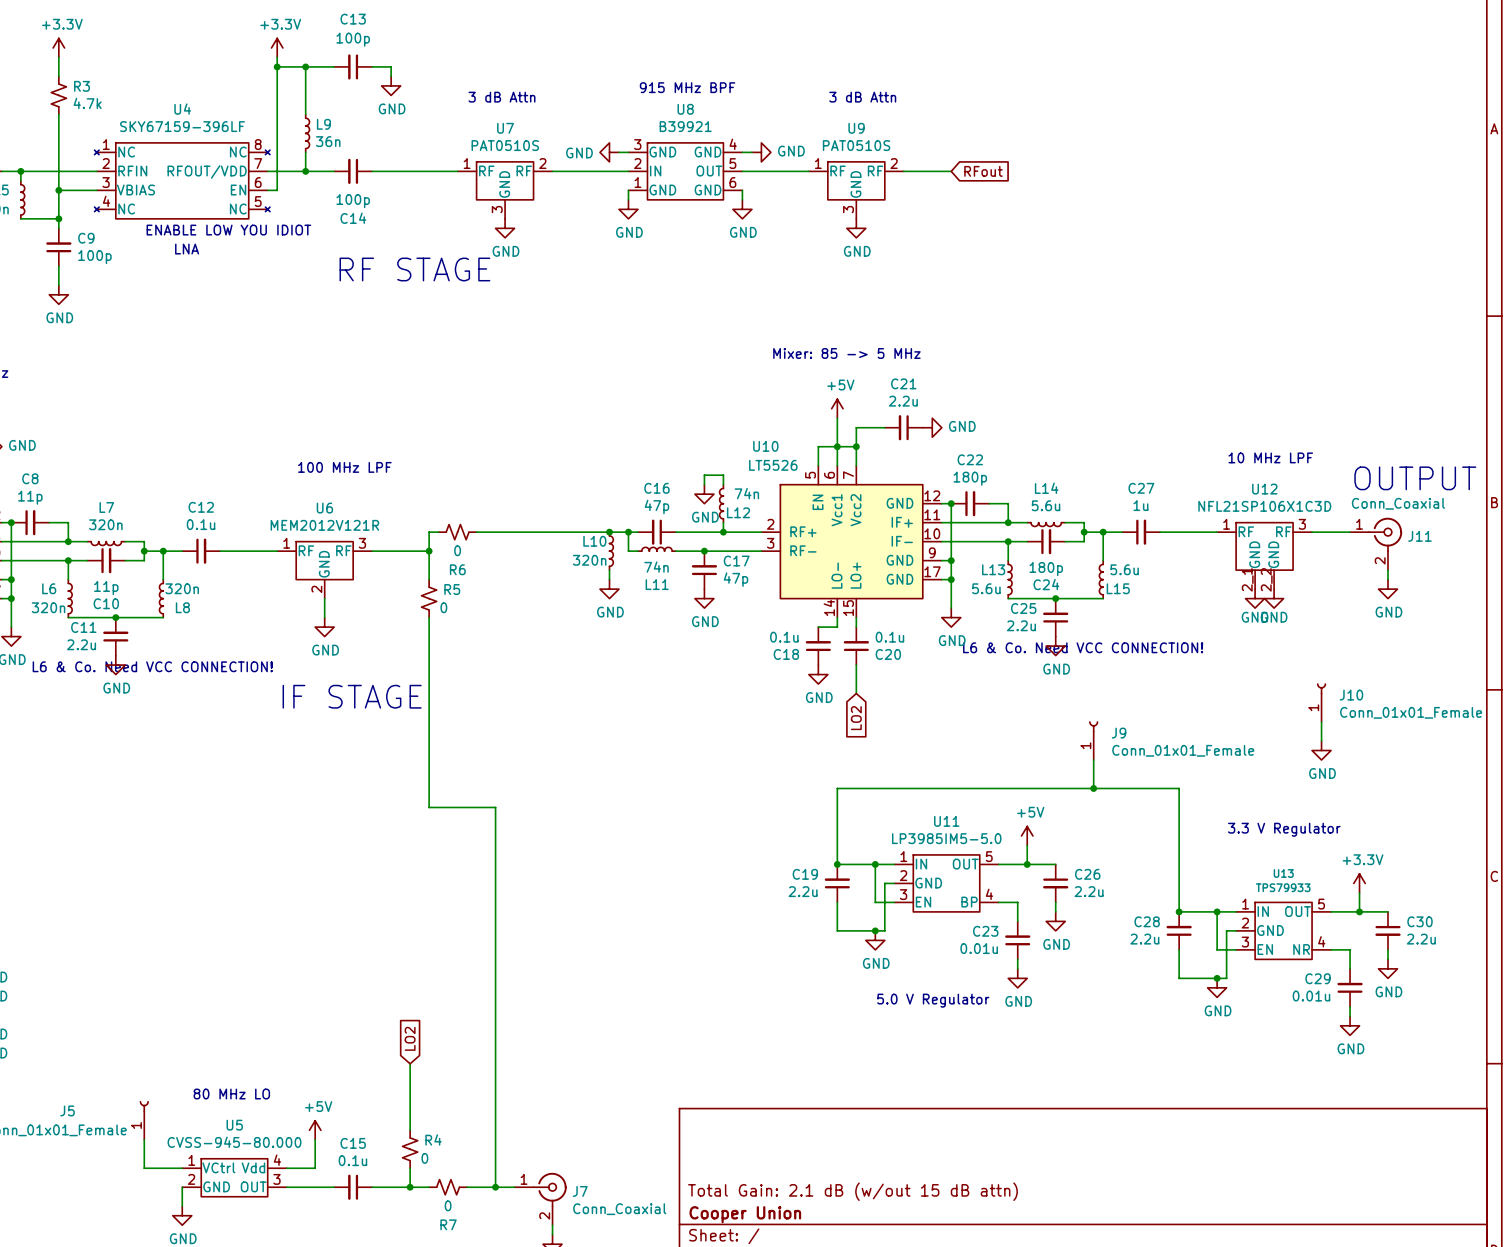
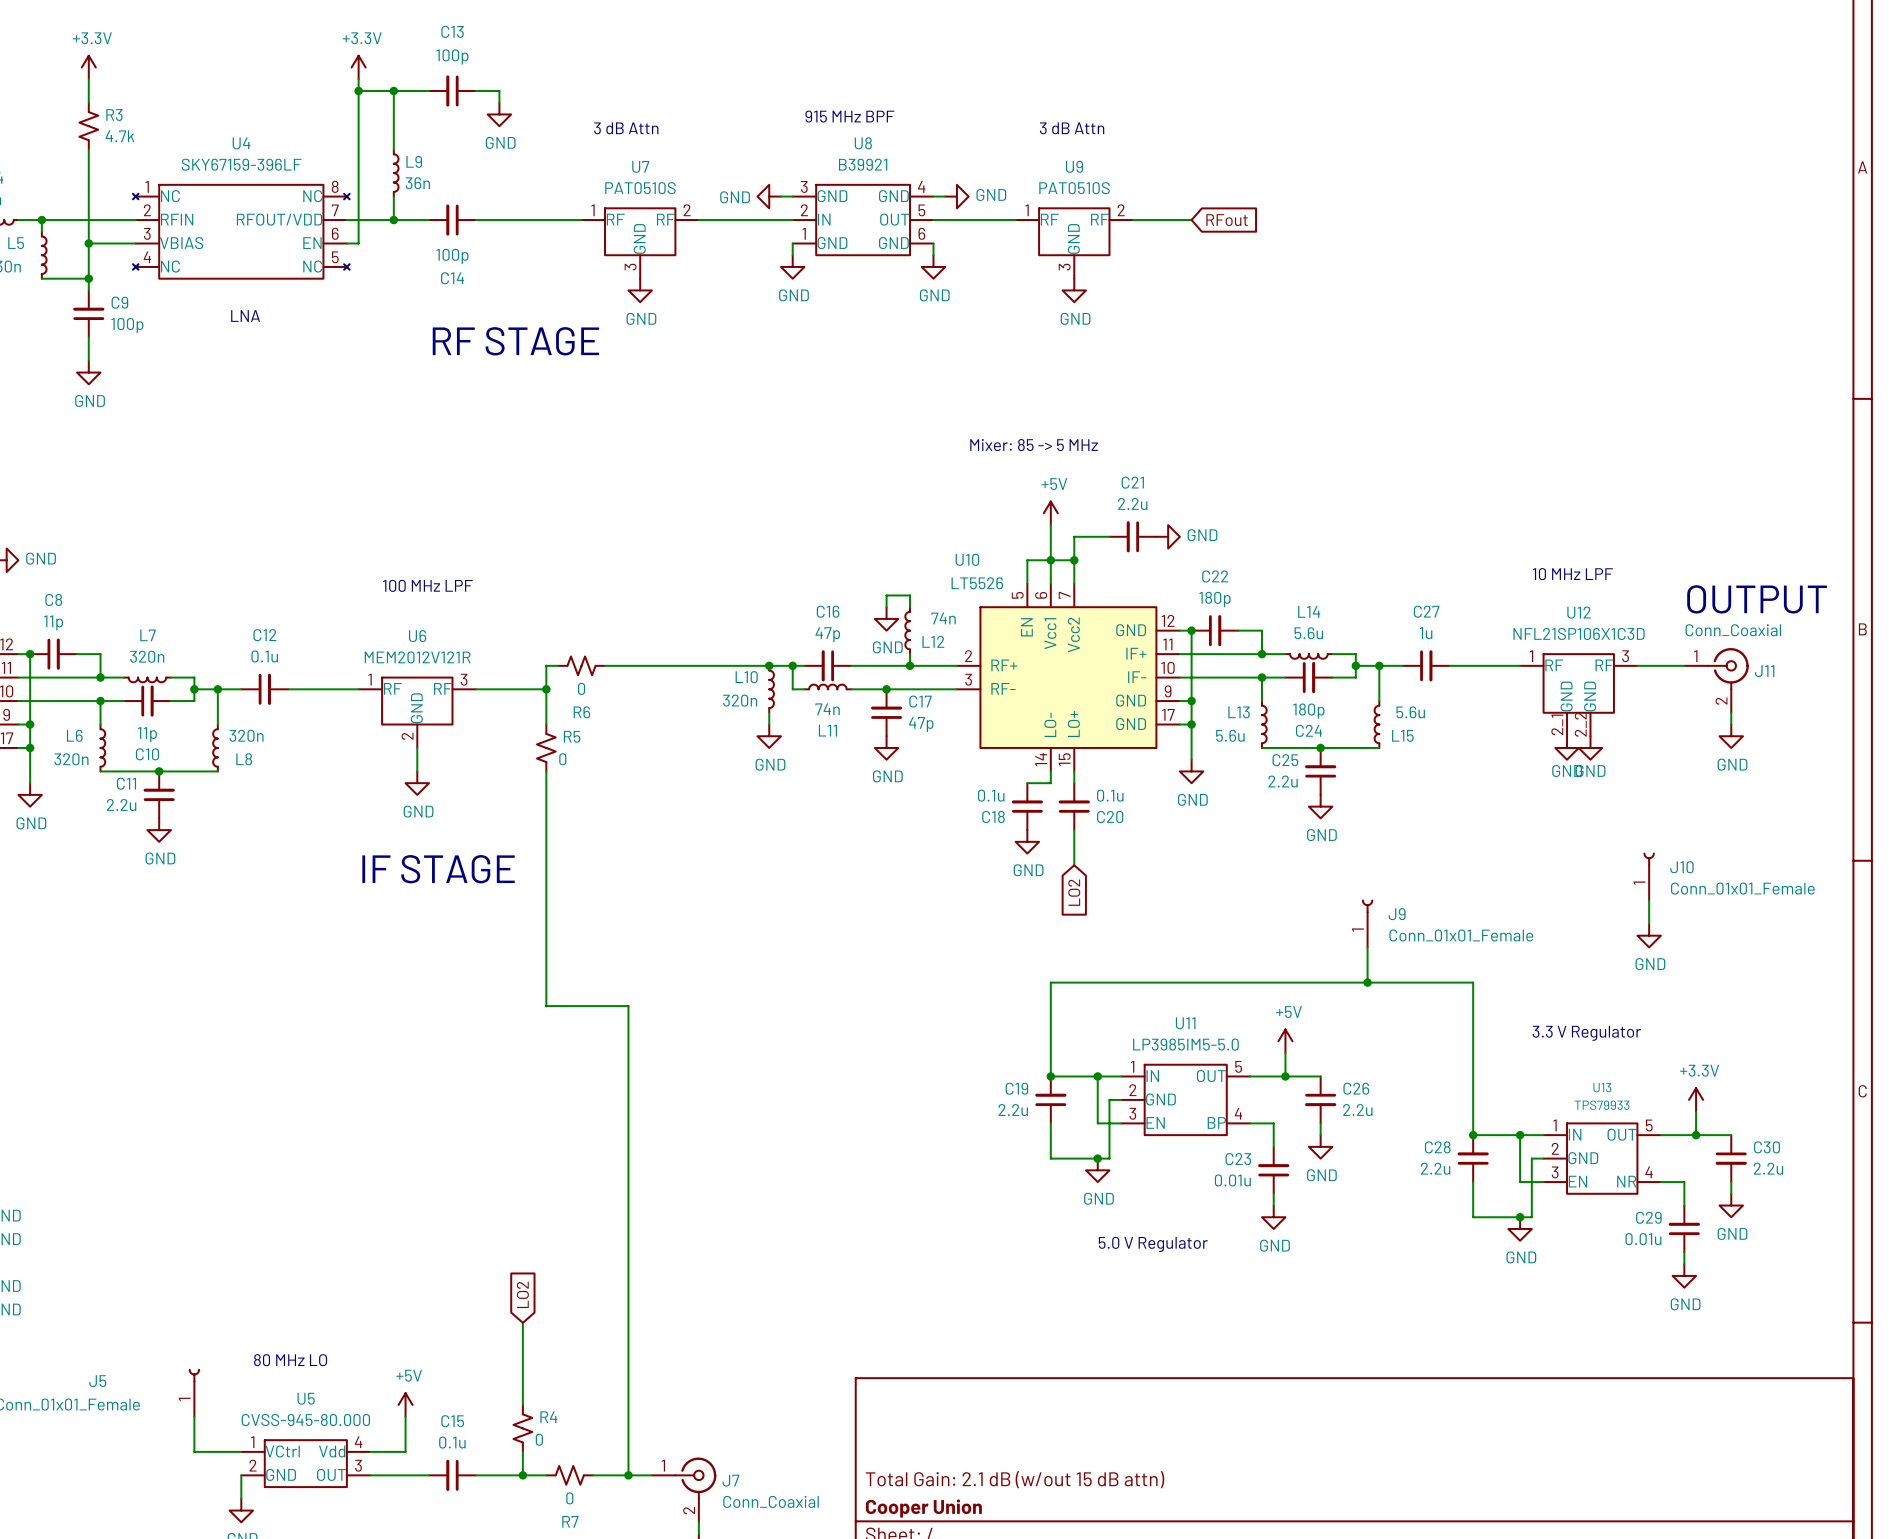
text: ENABLE LOW YOU IDIOT (228, 230) -> none
text: L6 & Co. Need VCC CONNECTION! (1083, 647) -> none
text: L6 & Co. Need VCC CONNECTION! (152, 666) -> none

